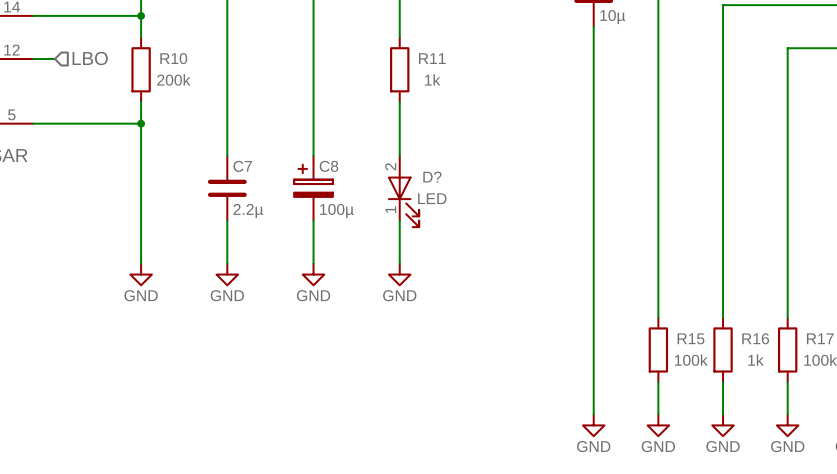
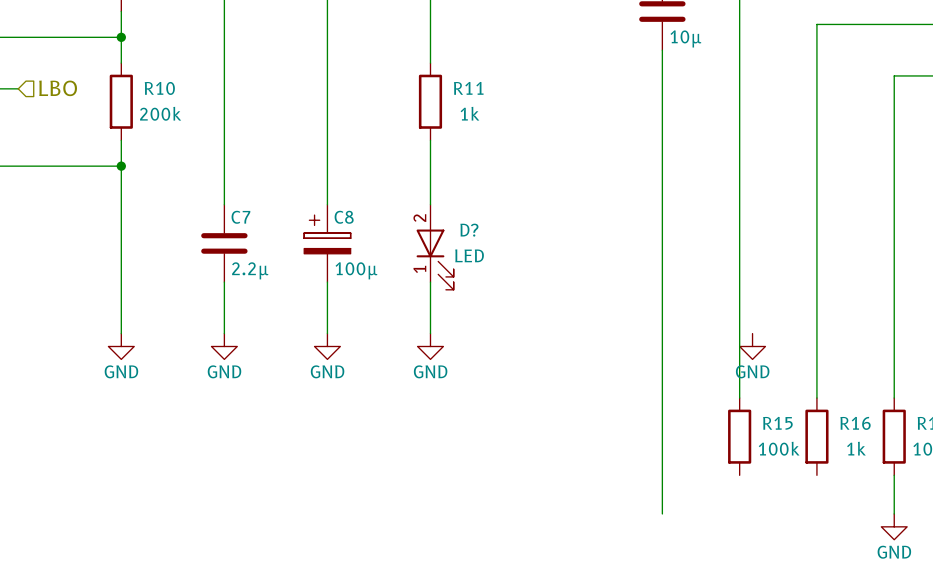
power symbol: none -> GND (752, 346)
wire: (658, 382) (658, 414) -> none
wire: (723, 382) (723, 414) -> none
power symbol: GND (593, 425) -> none
power symbol: GND (658, 425) -> none
power symbol: GND (723, 425) -> none

